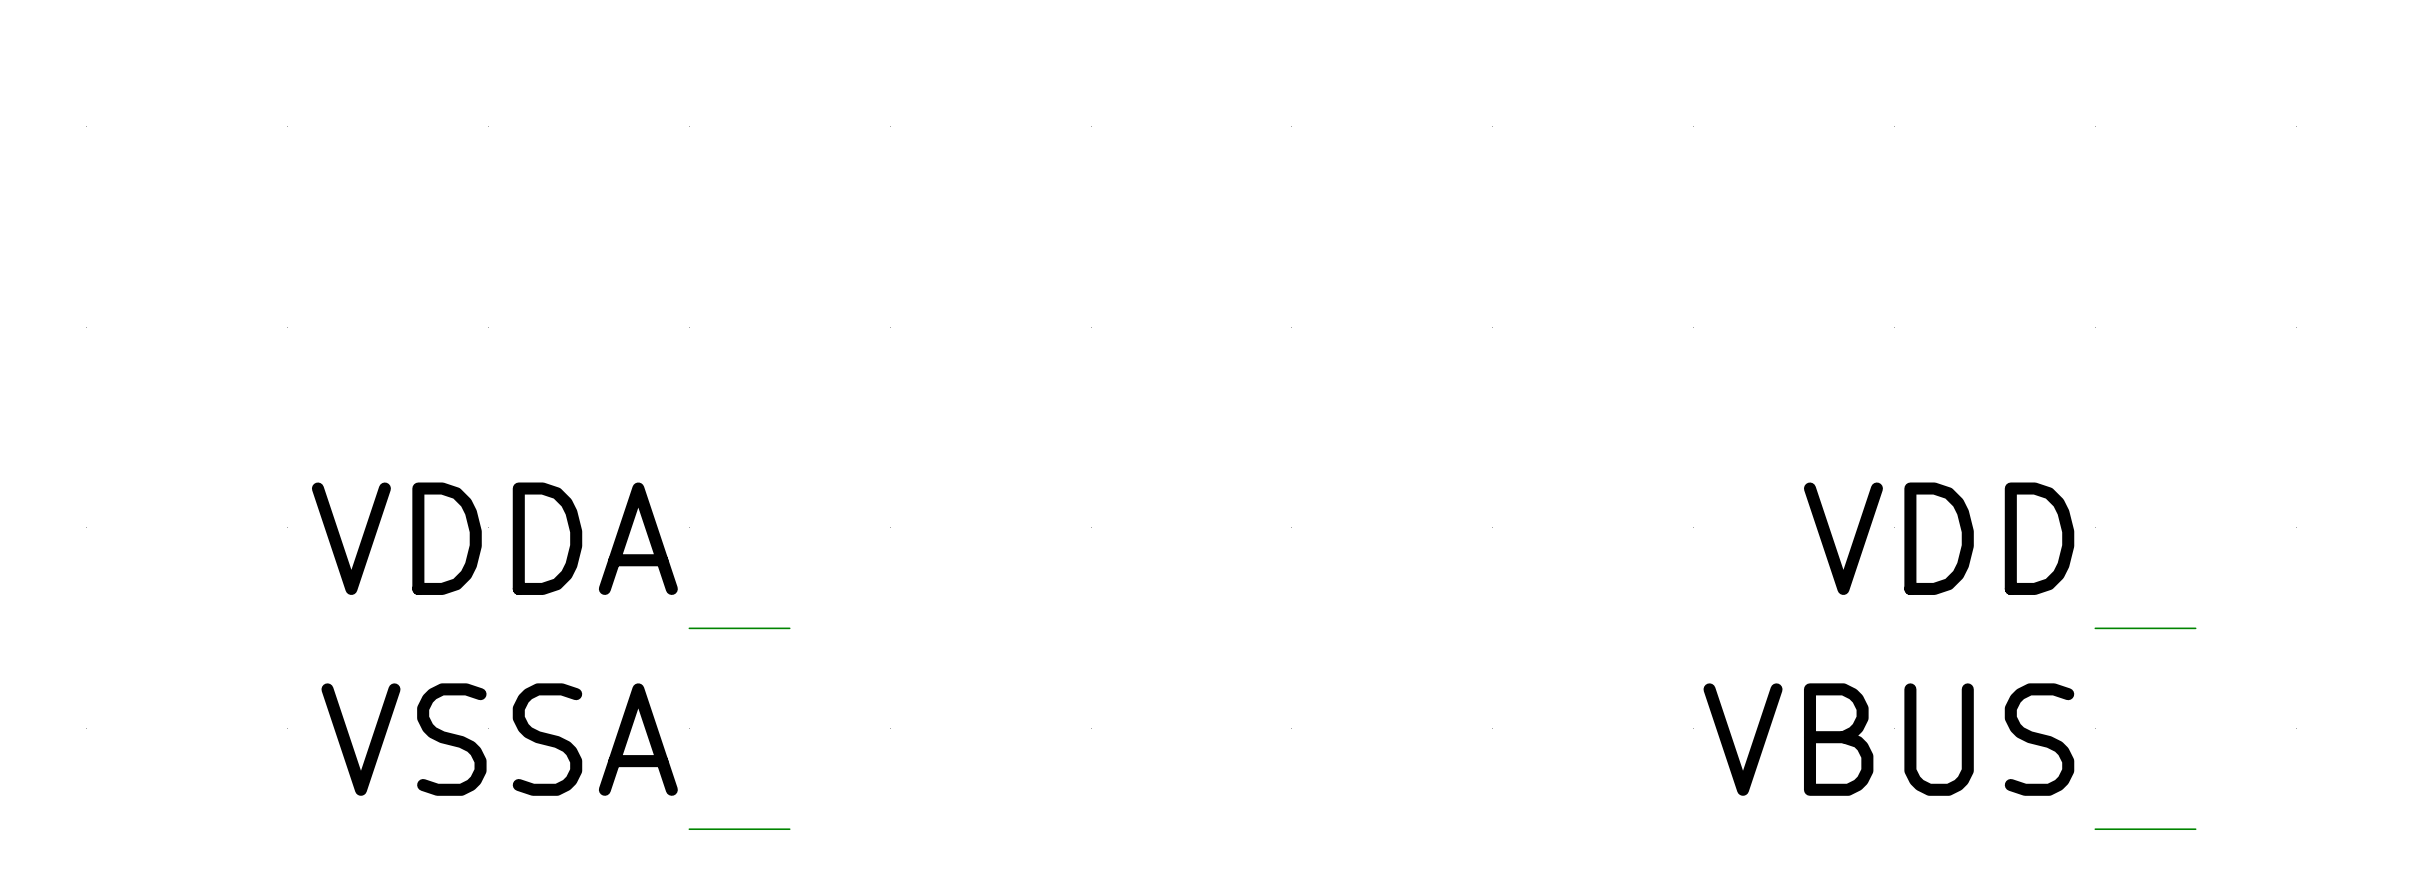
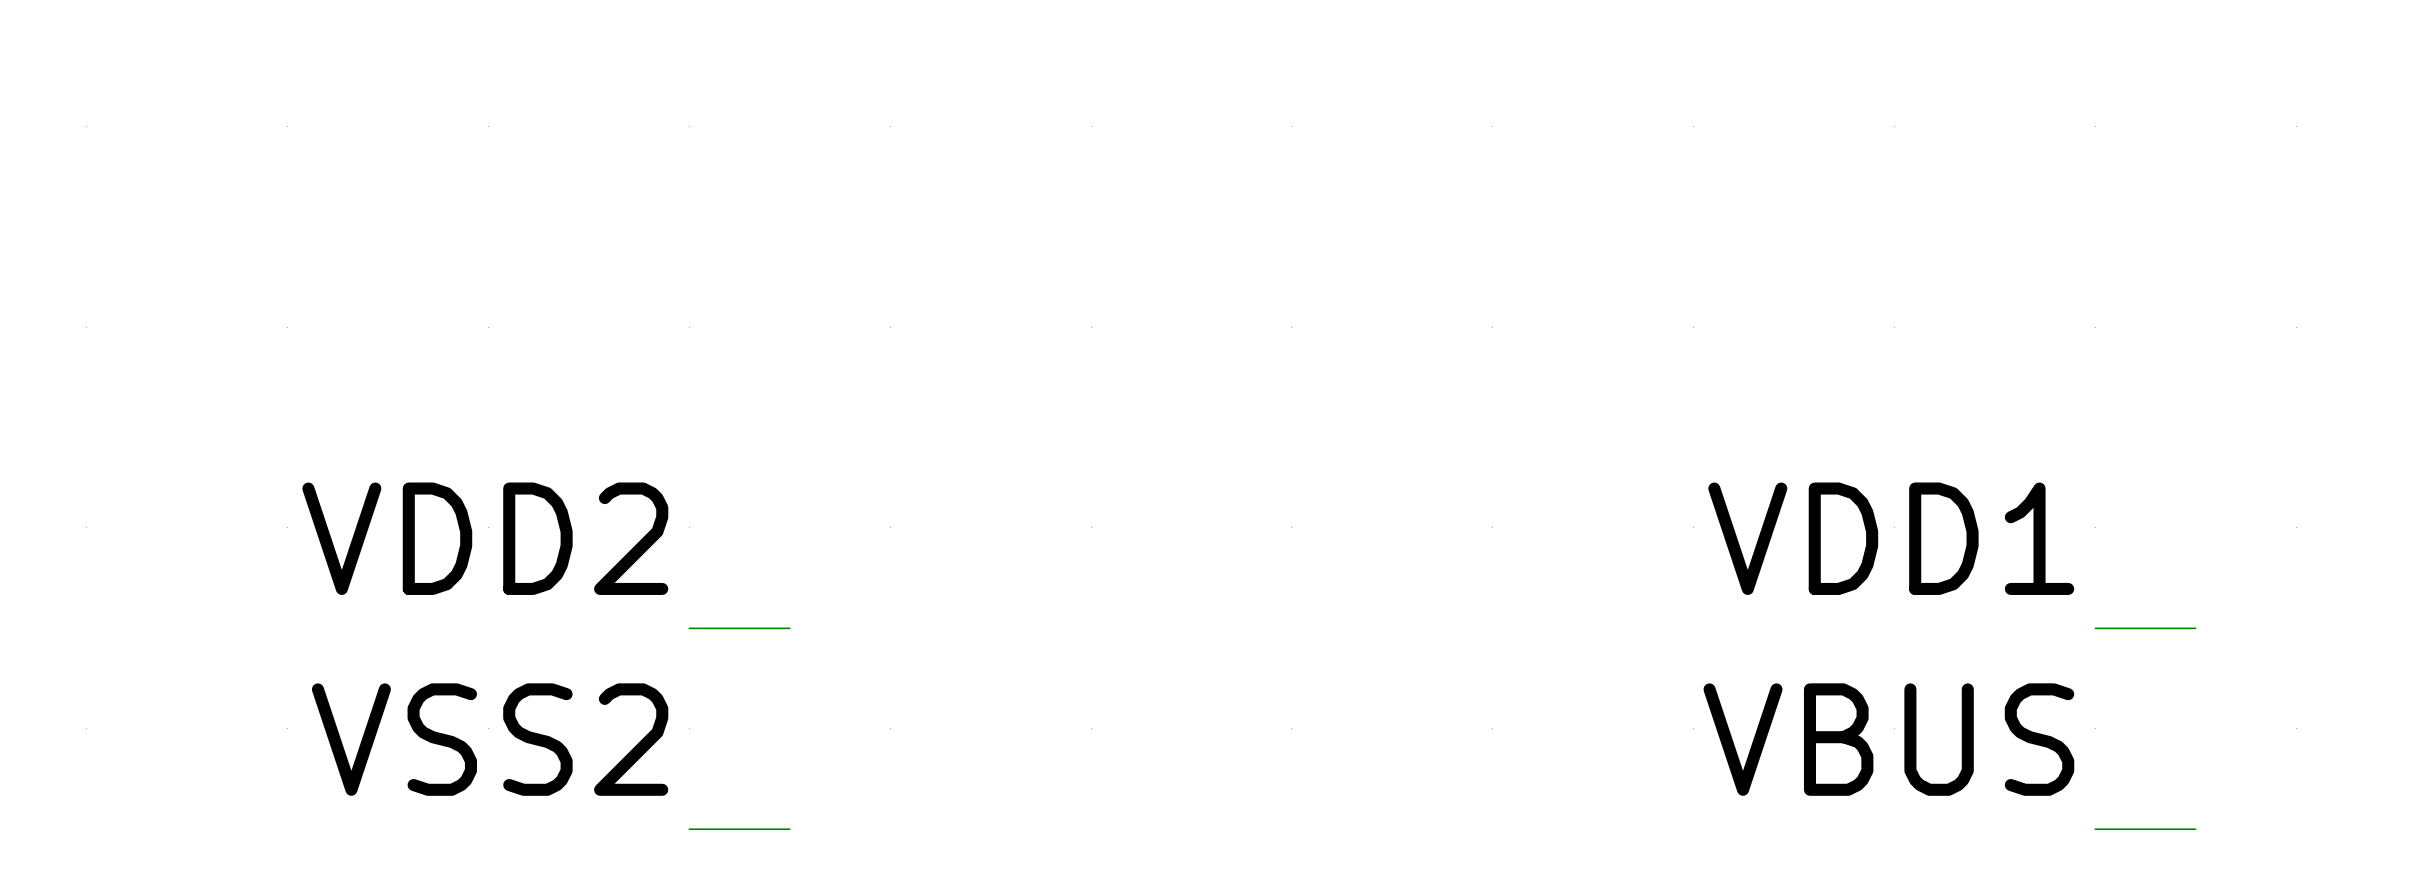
label: VDDA (494, 538) -> VDD2 (485, 538)
label: VDD (1939, 538) -> VDD1 (1891, 538)
label: VSSA (499, 739) -> VSS2 (490, 739)

